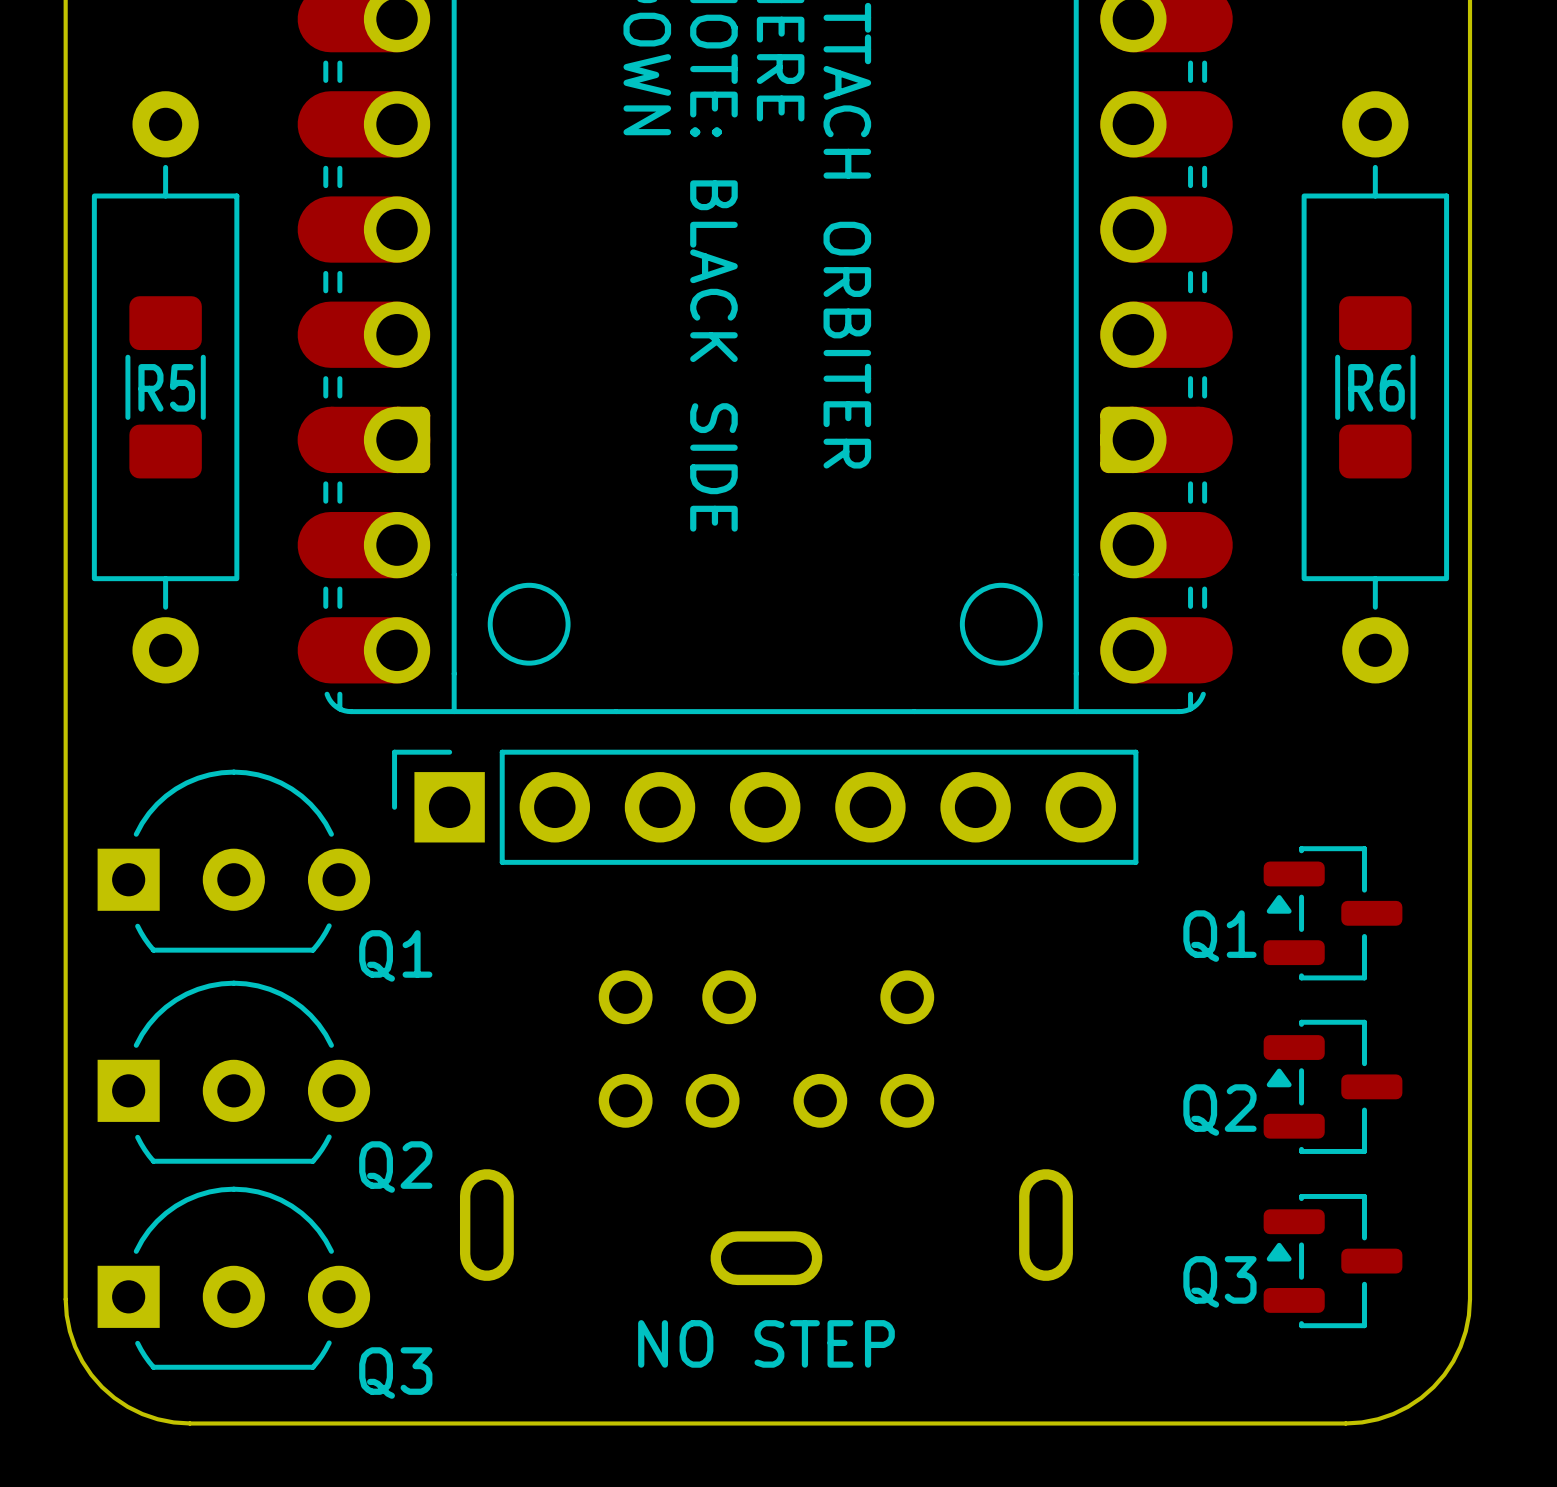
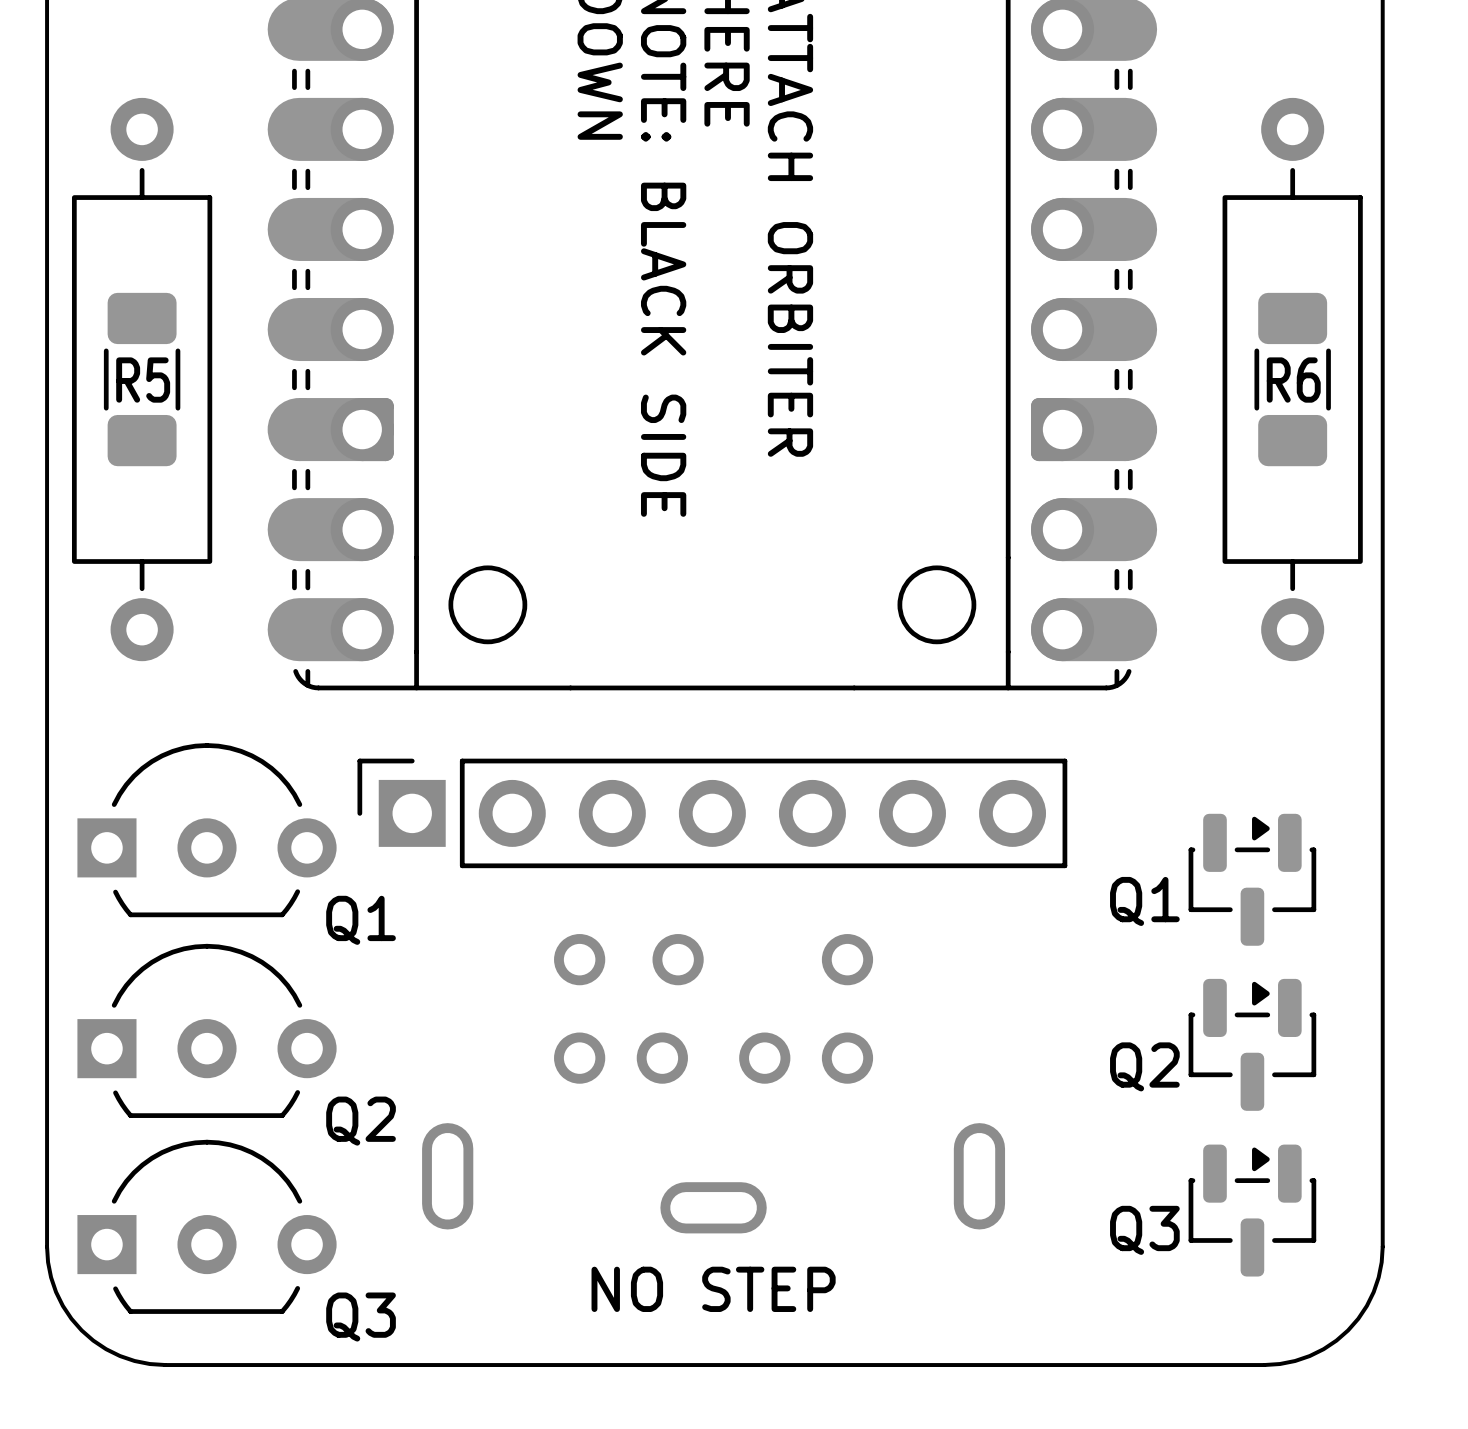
part position: (765, 807) -> (712, 813)
part rotation: 0° (1333, 913) -> 90° clockwise (1252, 879)
part rotation: 0° (1333, 1086) -> 90° clockwise (1252, 1044)
part rotation: 0° (1333, 1261) -> 90° clockwise (1252, 1210)

